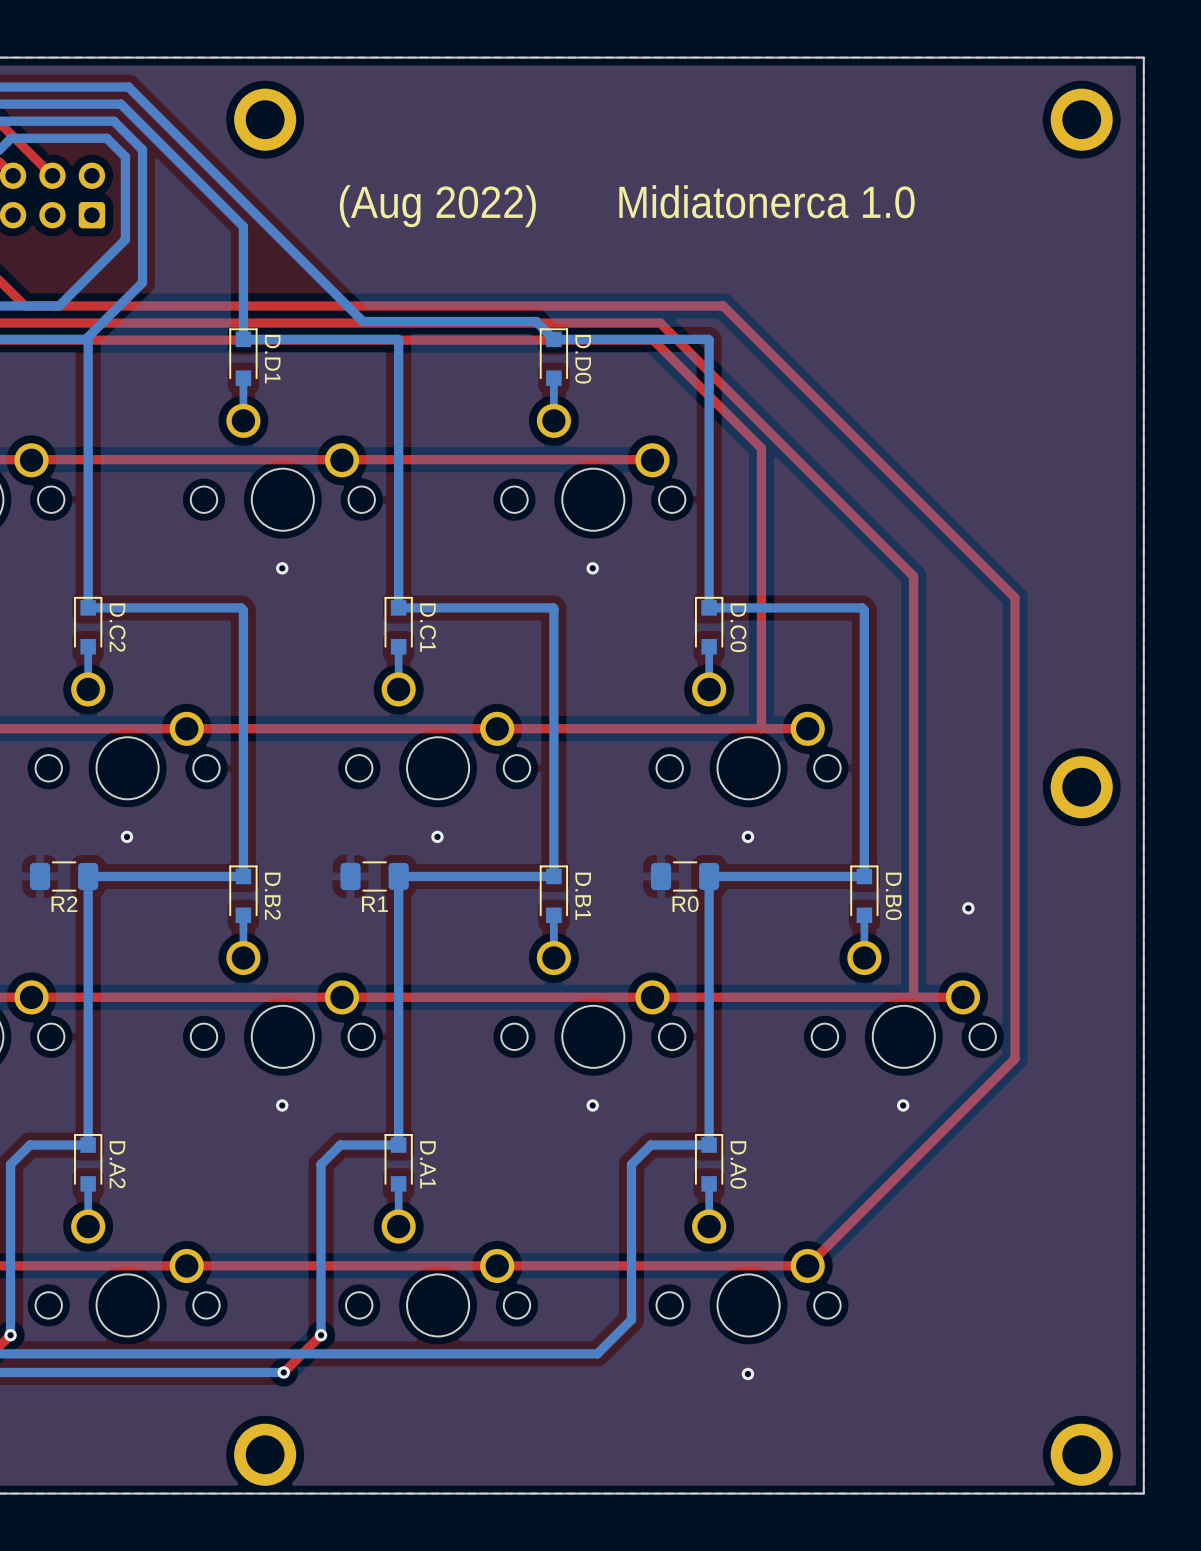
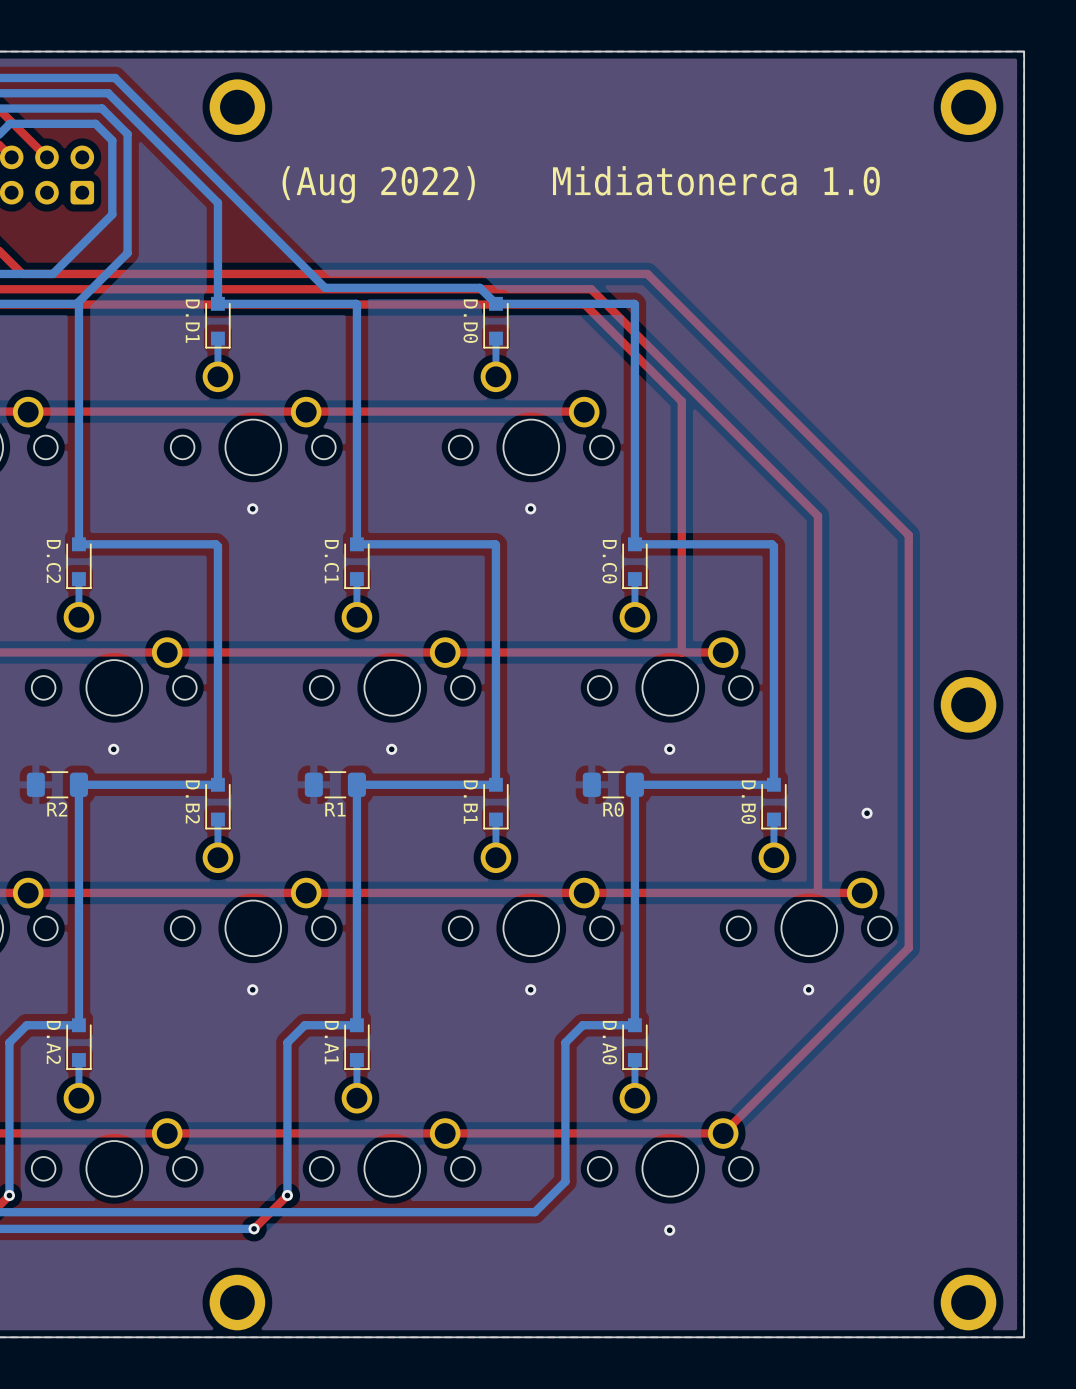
D.D1 rotation: 0° (243, 357) -> 180° (217, 322)
D.D0 rotation: 0° (553, 357) -> 180° (495, 322)
D.C2 rotation: 0° (88, 625) -> 180° (78, 563)
D.C1 rotation: 0° (398, 625) -> 180° (356, 563)
D.C0 rotation: 0° (709, 625) -> 180° (634, 563)
D.B2 rotation: 0° (243, 894) -> 180° (217, 803)
D.B1 rotation: 0° (553, 894) -> 180° (495, 803)
D.B0 rotation: 0° (864, 894) -> 180° (773, 803)
D.A2 rotation: 0° (88, 1162) -> 180° (78, 1044)
D.A1 rotation: 0° (398, 1162) -> 180° (356, 1044)
D.A0 rotation: 0° (709, 1162) -> 180° (634, 1044)

